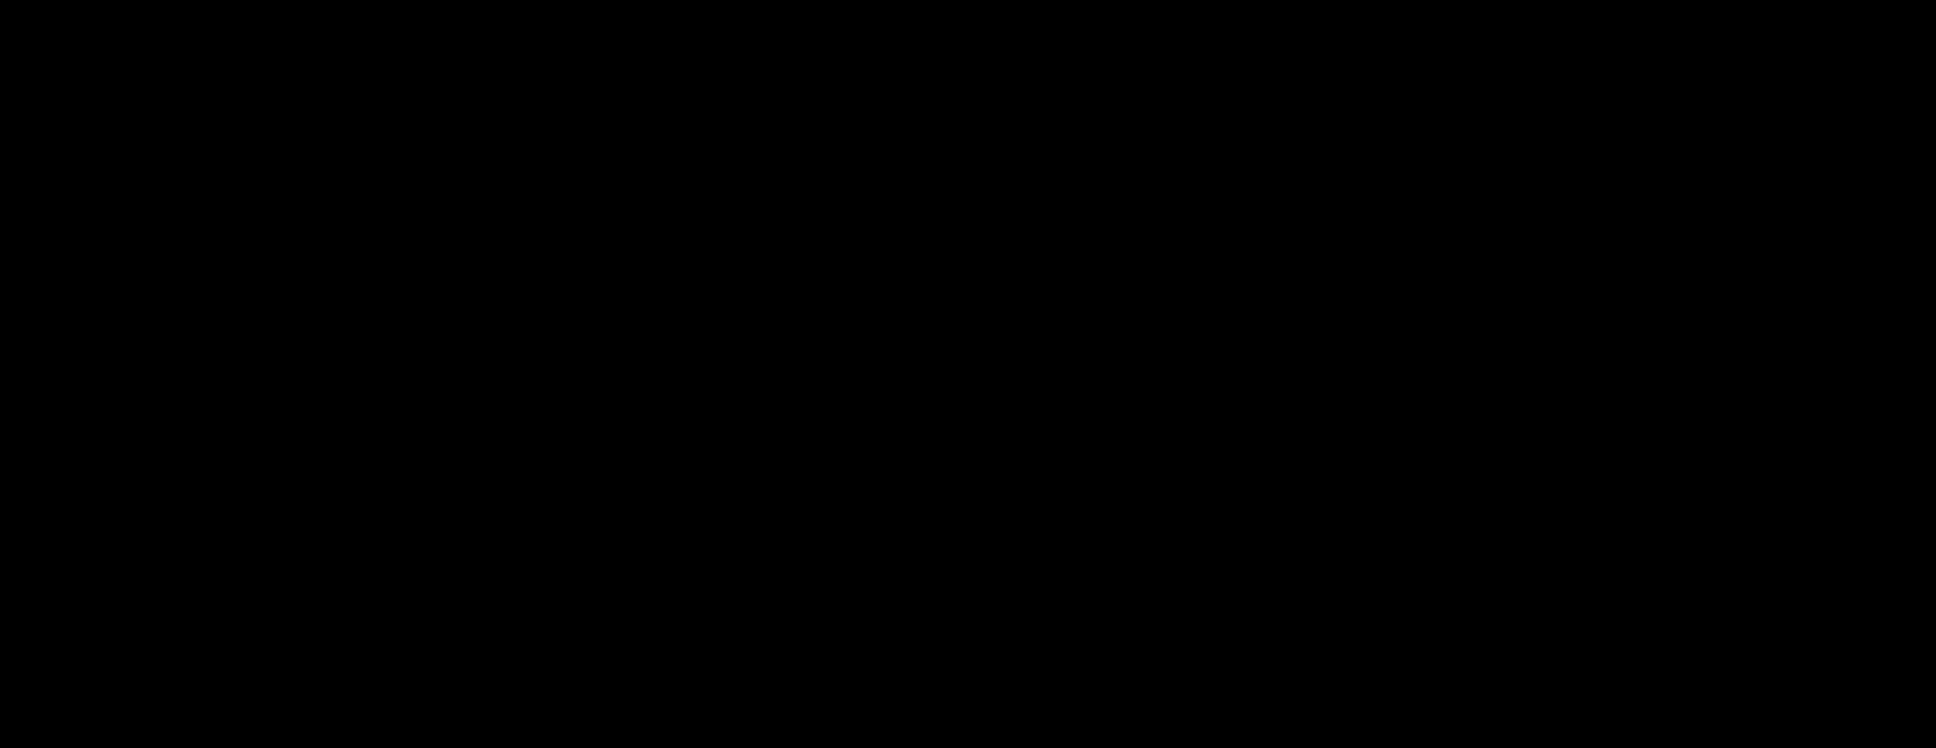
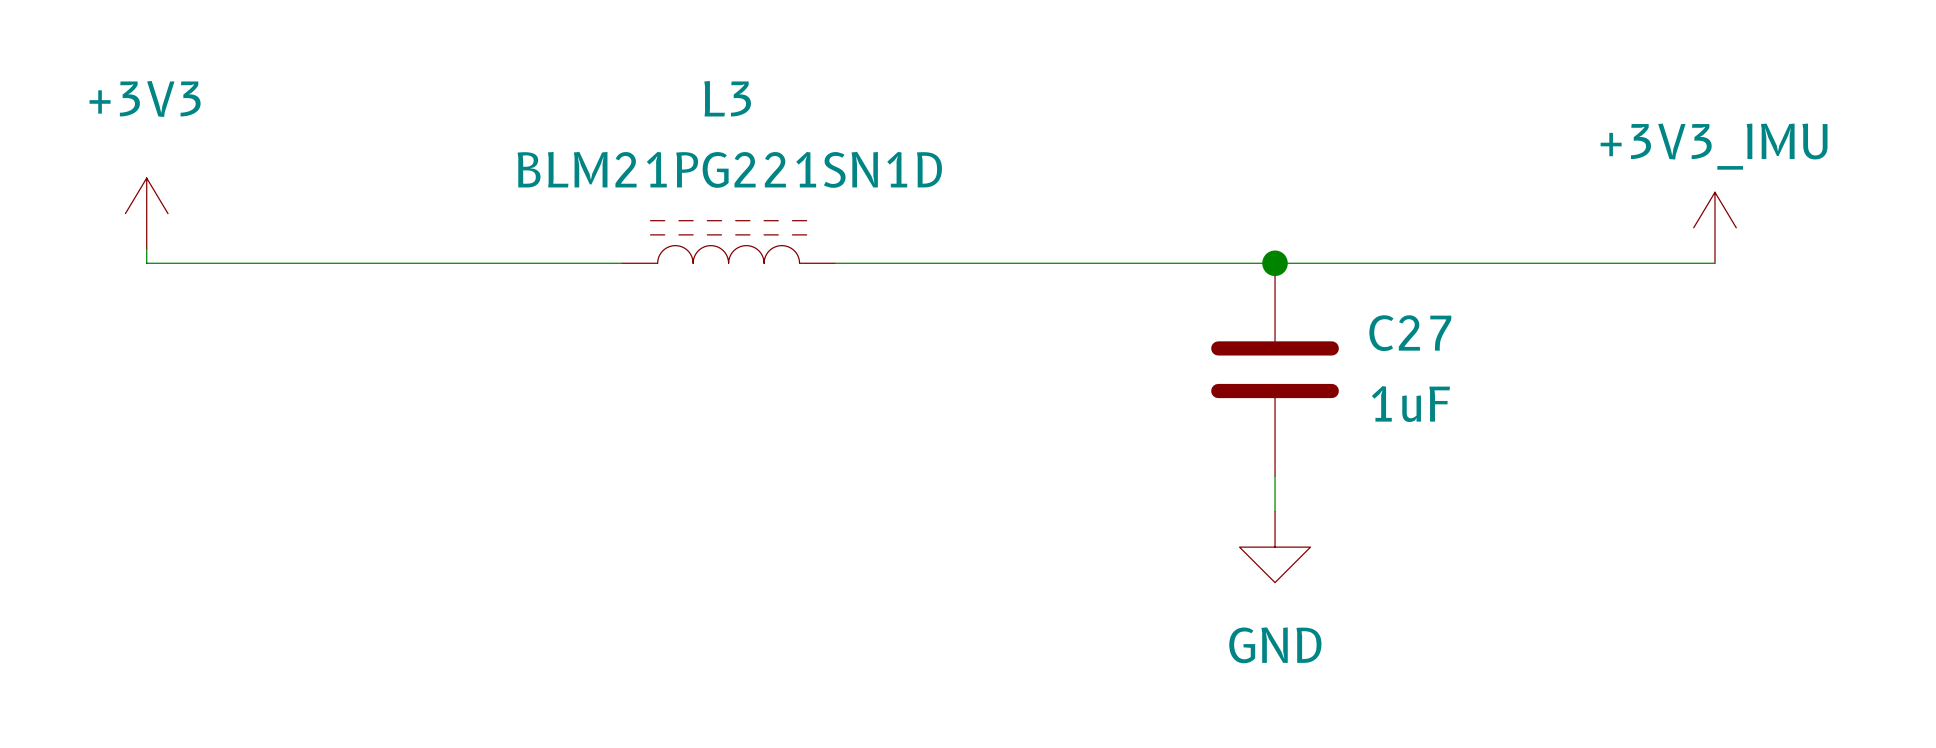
power symbol: none -> +3V3 (146, 213)
power symbol: none -> +3V3_IMU (1714, 227)
L3: none -> BLM21PG221SN1D (728, 241)
wire: none -> (146, 249) (146, 263) (622, 263)
wire: none -> (835, 263) (1714, 263)
junction: none -> (1275, 263)
C27: none -> 1uF (1275, 369)
wire: none -> (1275, 476) (1275, 511)
power symbol: none -> GND (1275, 547)

